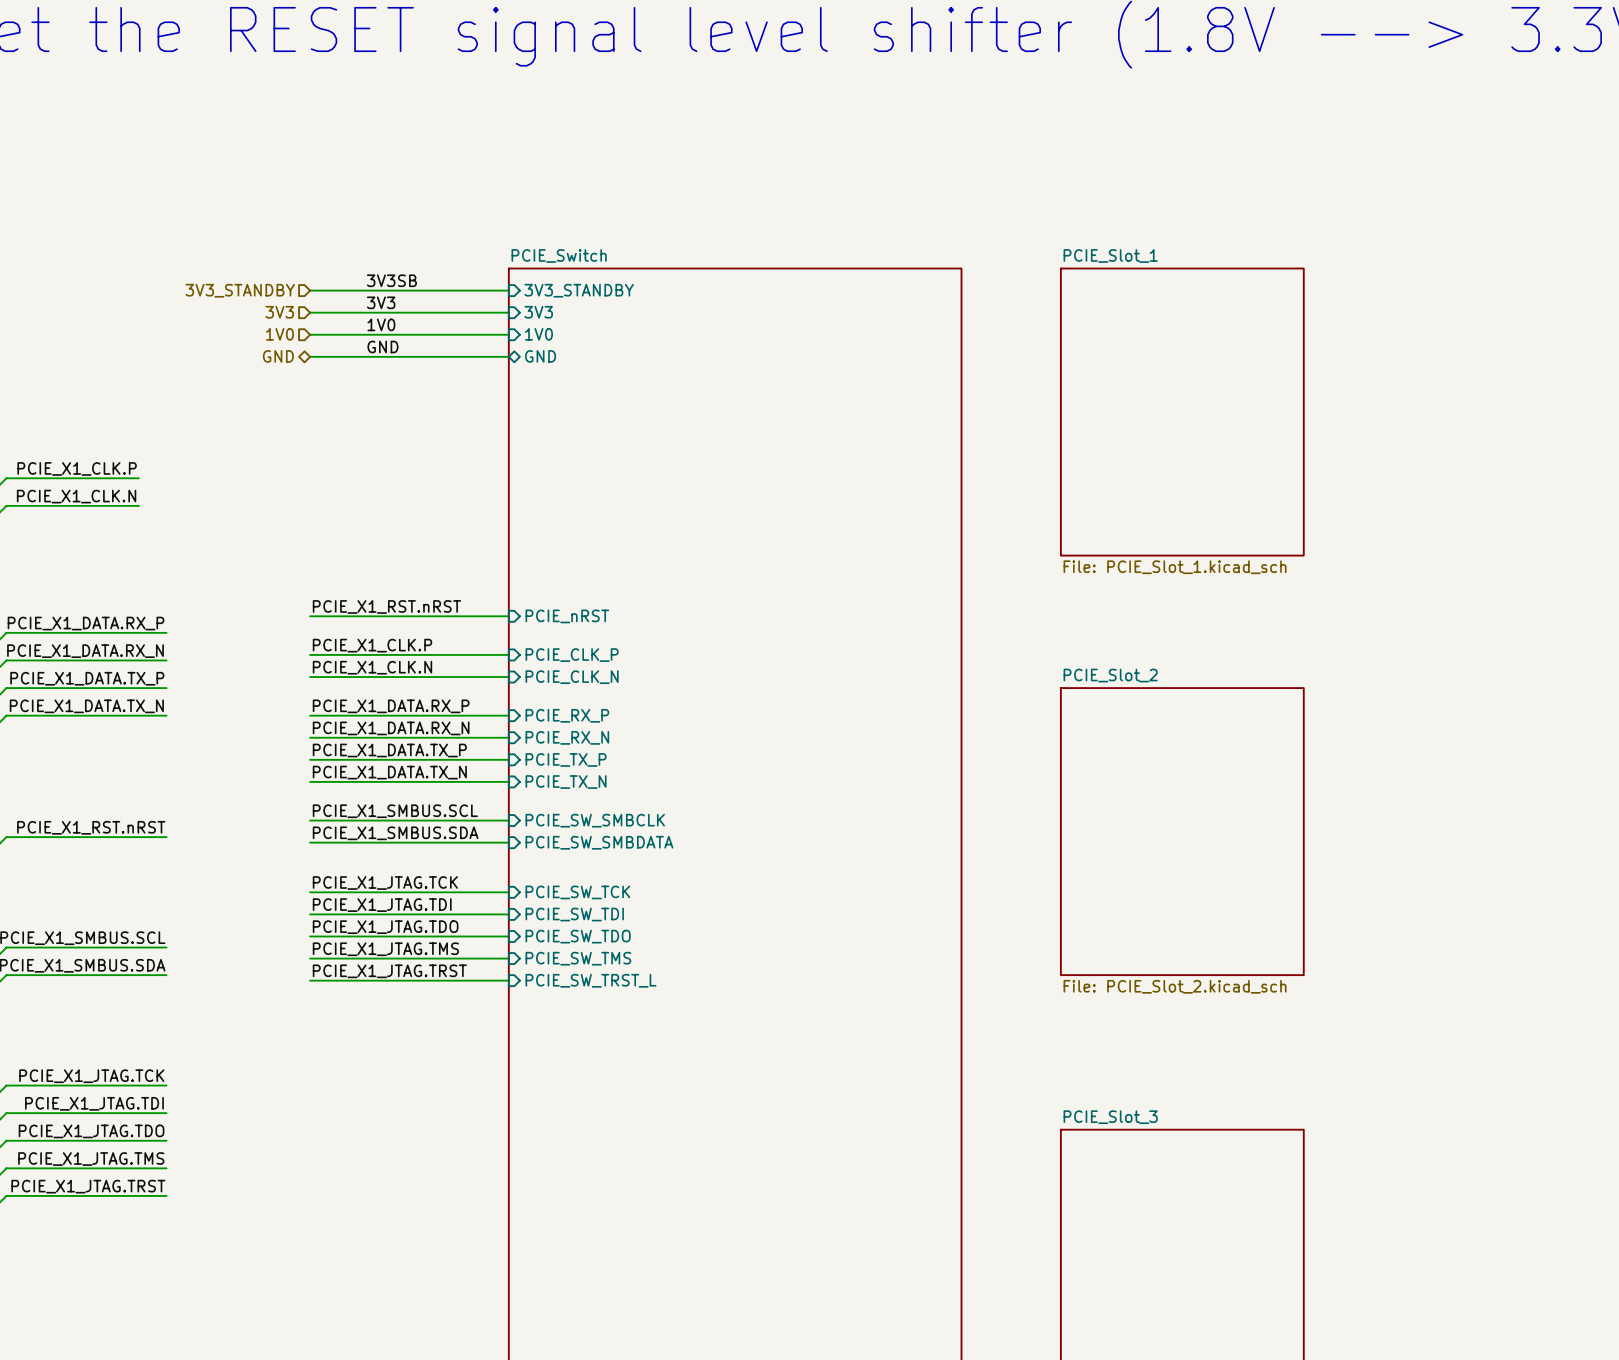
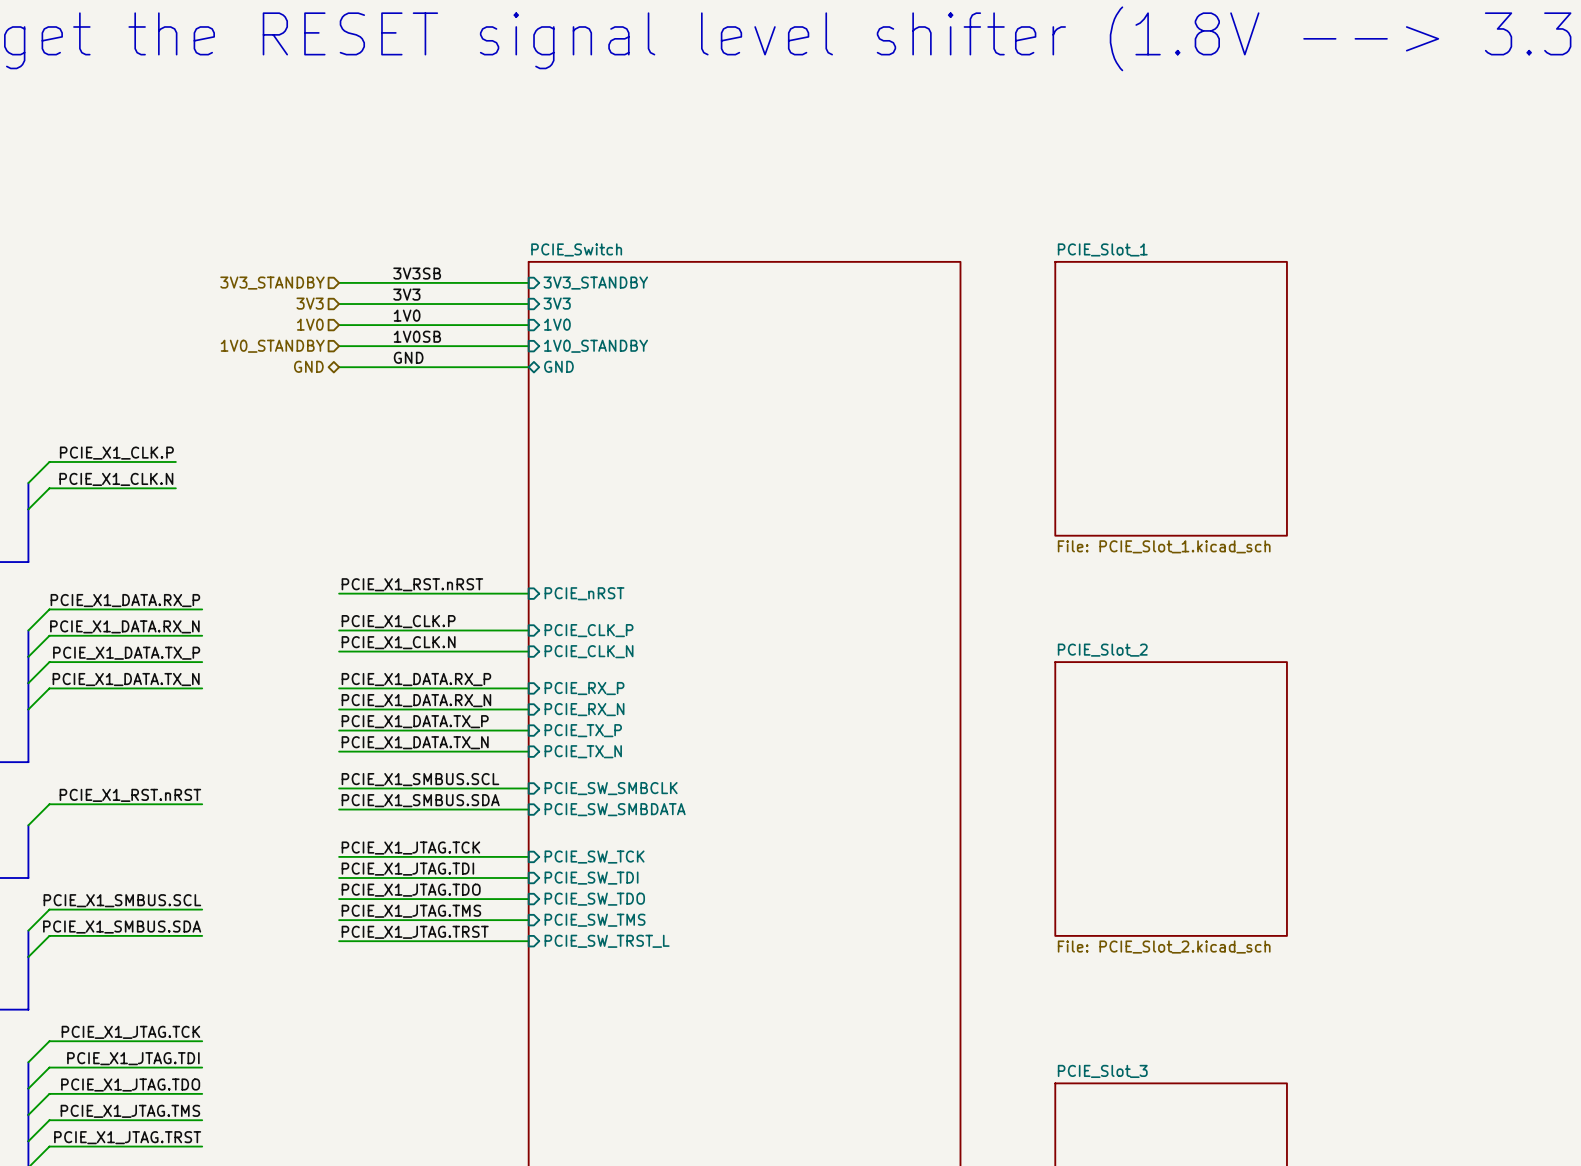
label: GND (382, 346) -> 1V0SB (417, 336)
hierarchical label shape: bidirectional (278, 356) -> input (272, 346)
hierarchical label: GND (278, 356) -> 1V0_STANDBY (272, 346)
sheet pin shape: bidirectional (540, 356) -> input (596, 346)
sheet pin: GND (540, 356) -> 1V0_STANDBY (596, 346)
label: none -> GND (408, 357)
hierarchical label: none -> GND (308, 366)
wire: none -> (339, 367) (528, 367)
sheet pin: none -> GND (558, 366)

